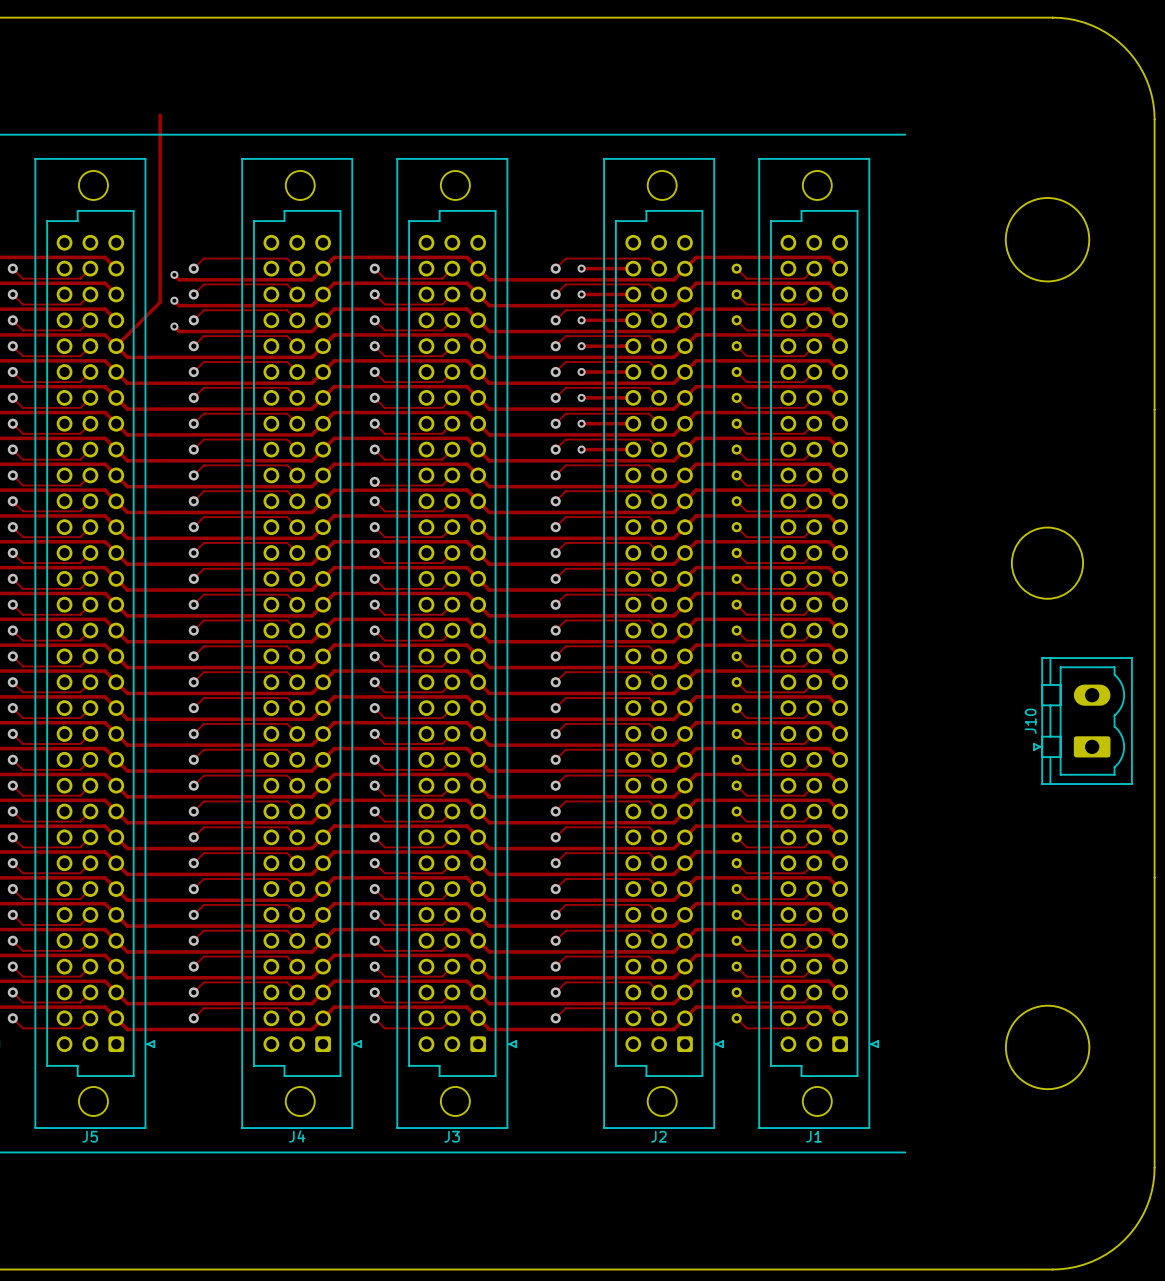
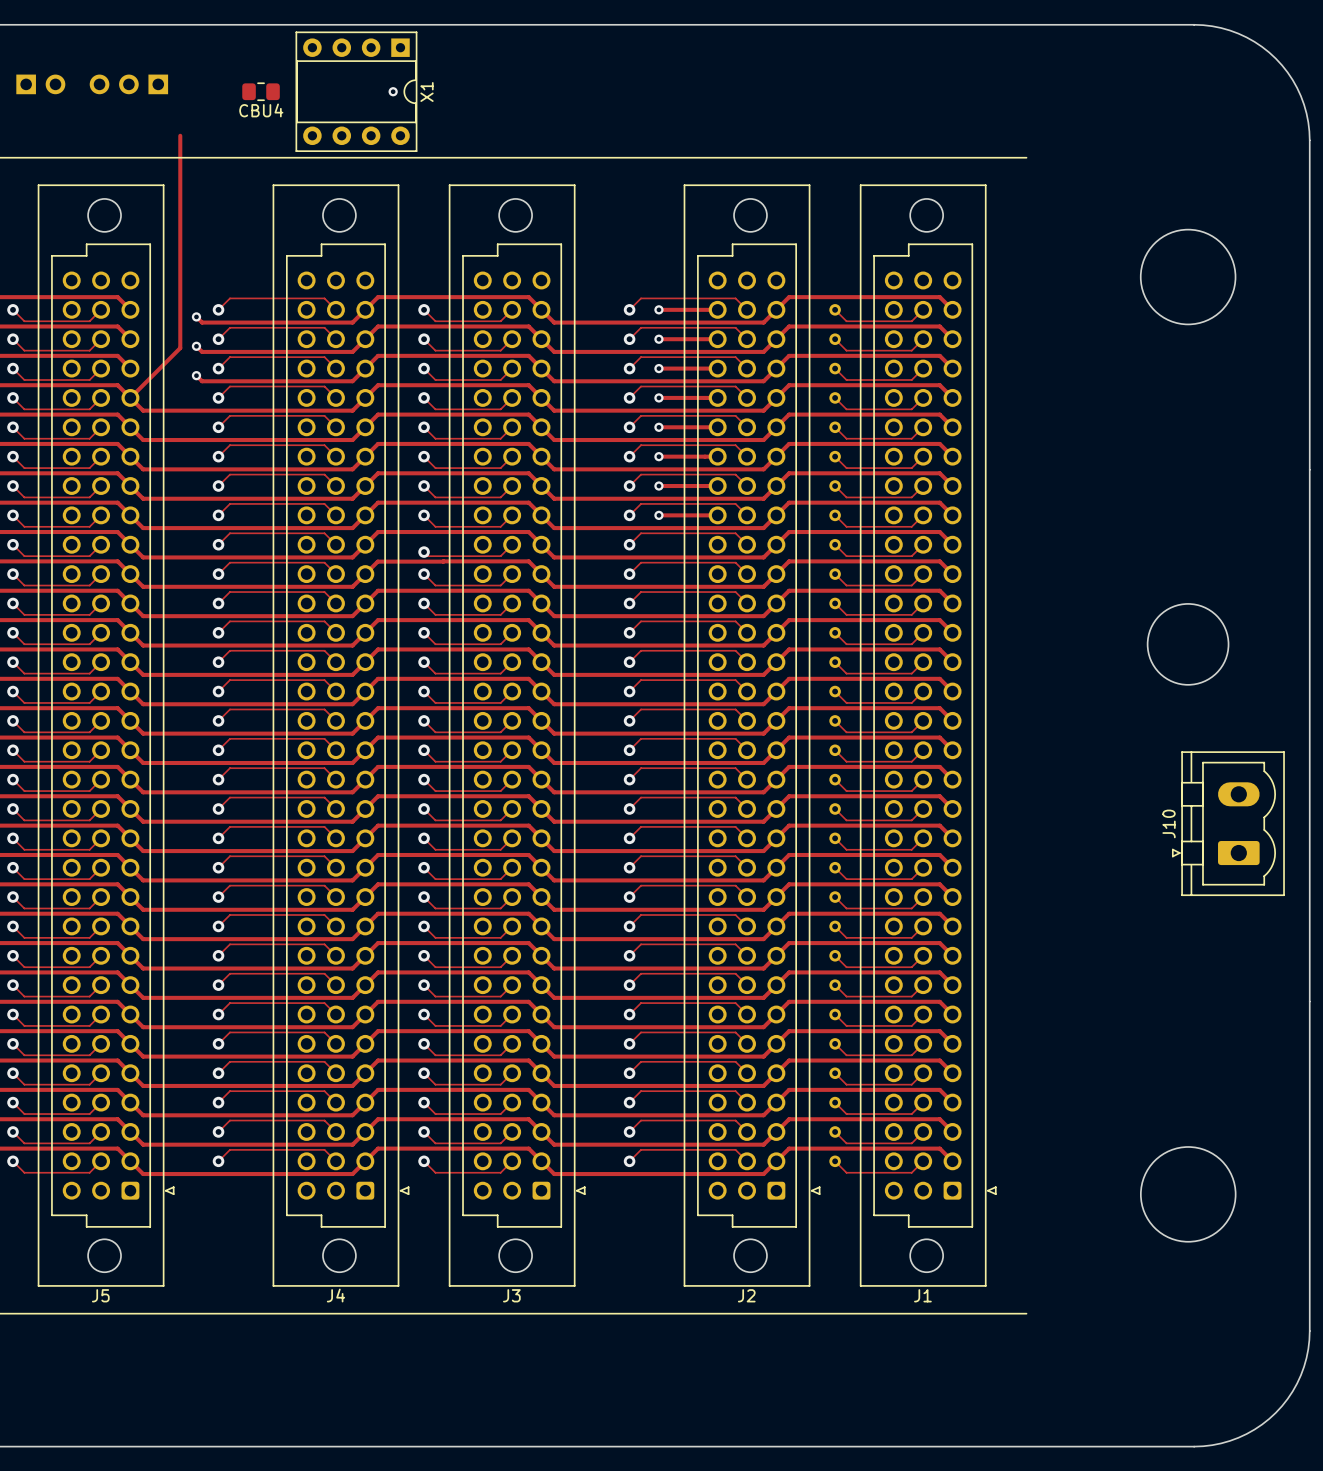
part: none -> (40, 84)
part: none -> (128, 84)
CBU4: none -> (261, 91)
X1: none -> (356, 91)
via: none -> (393, 91)

